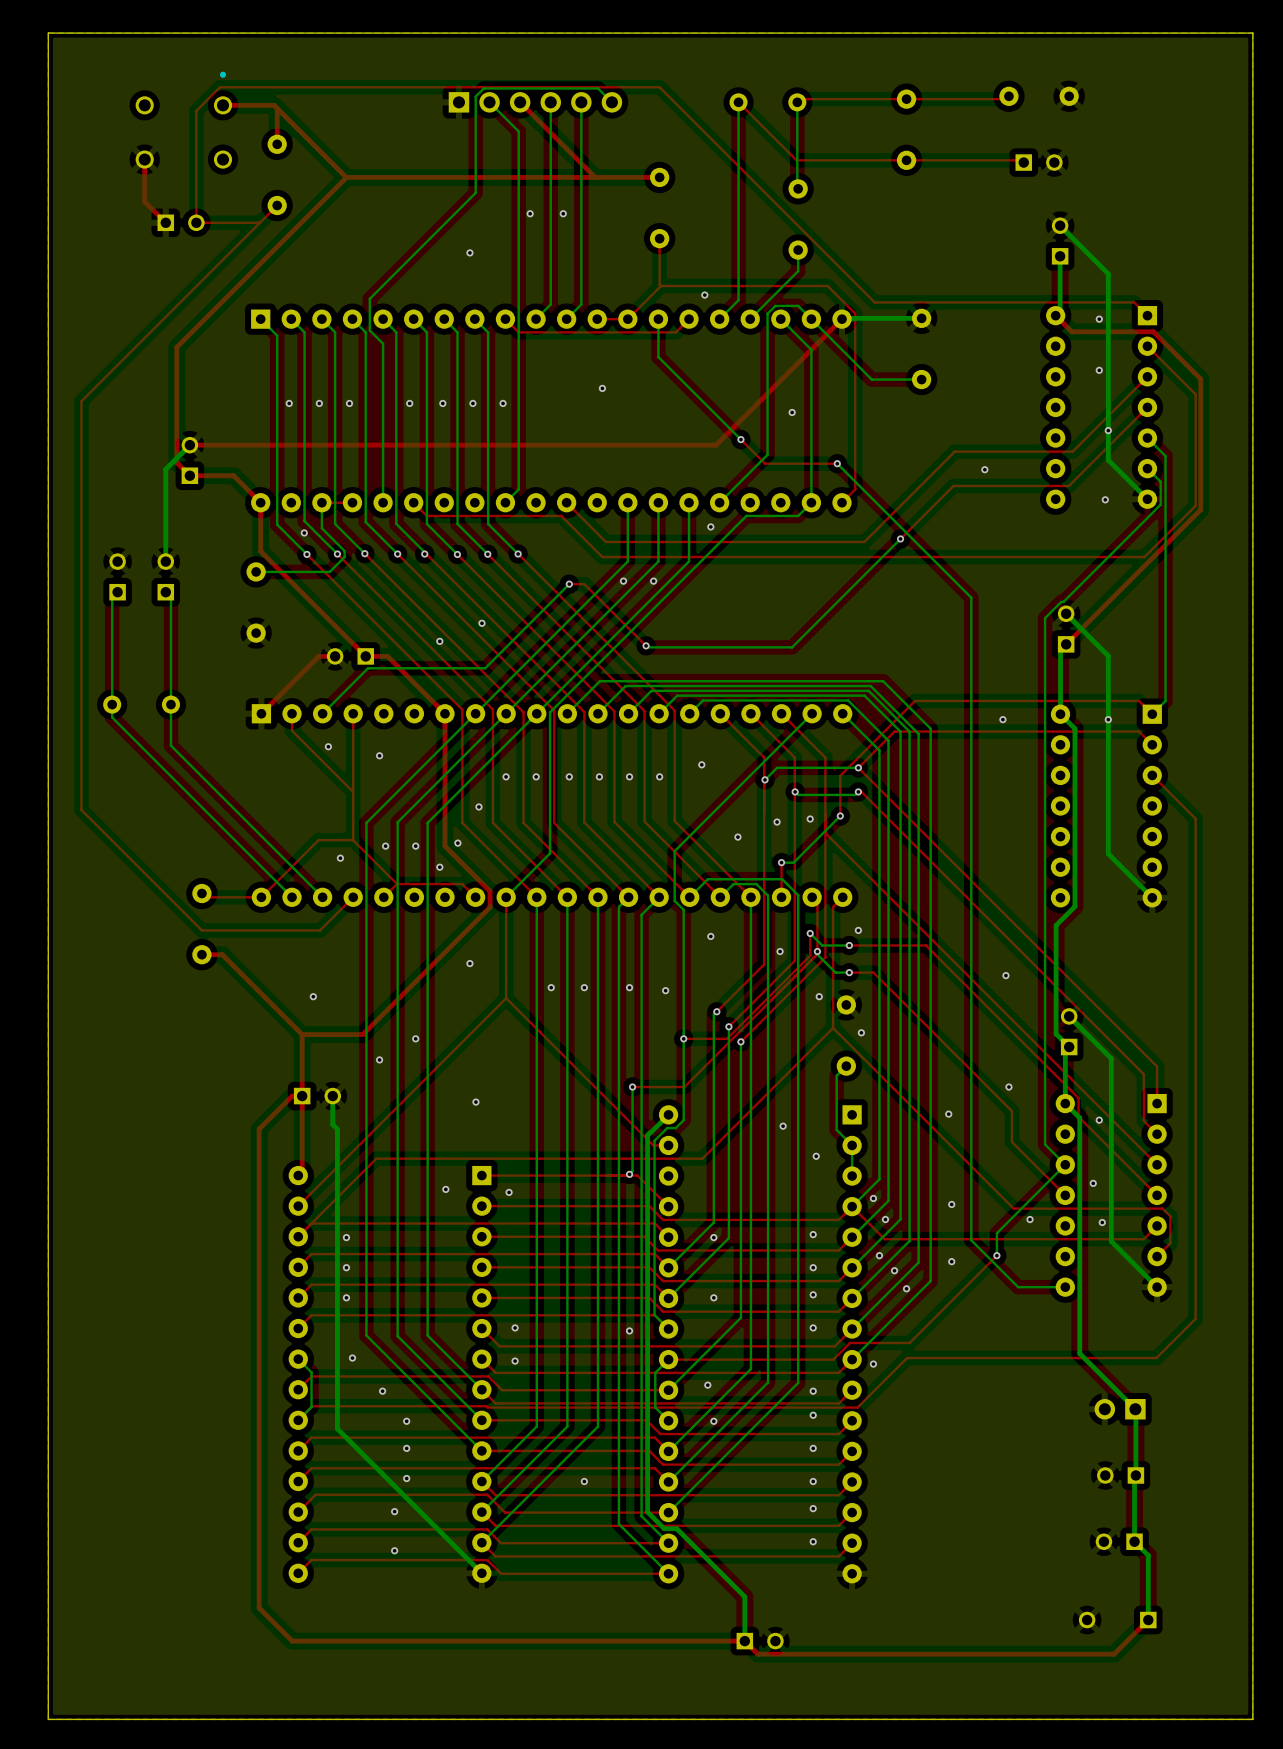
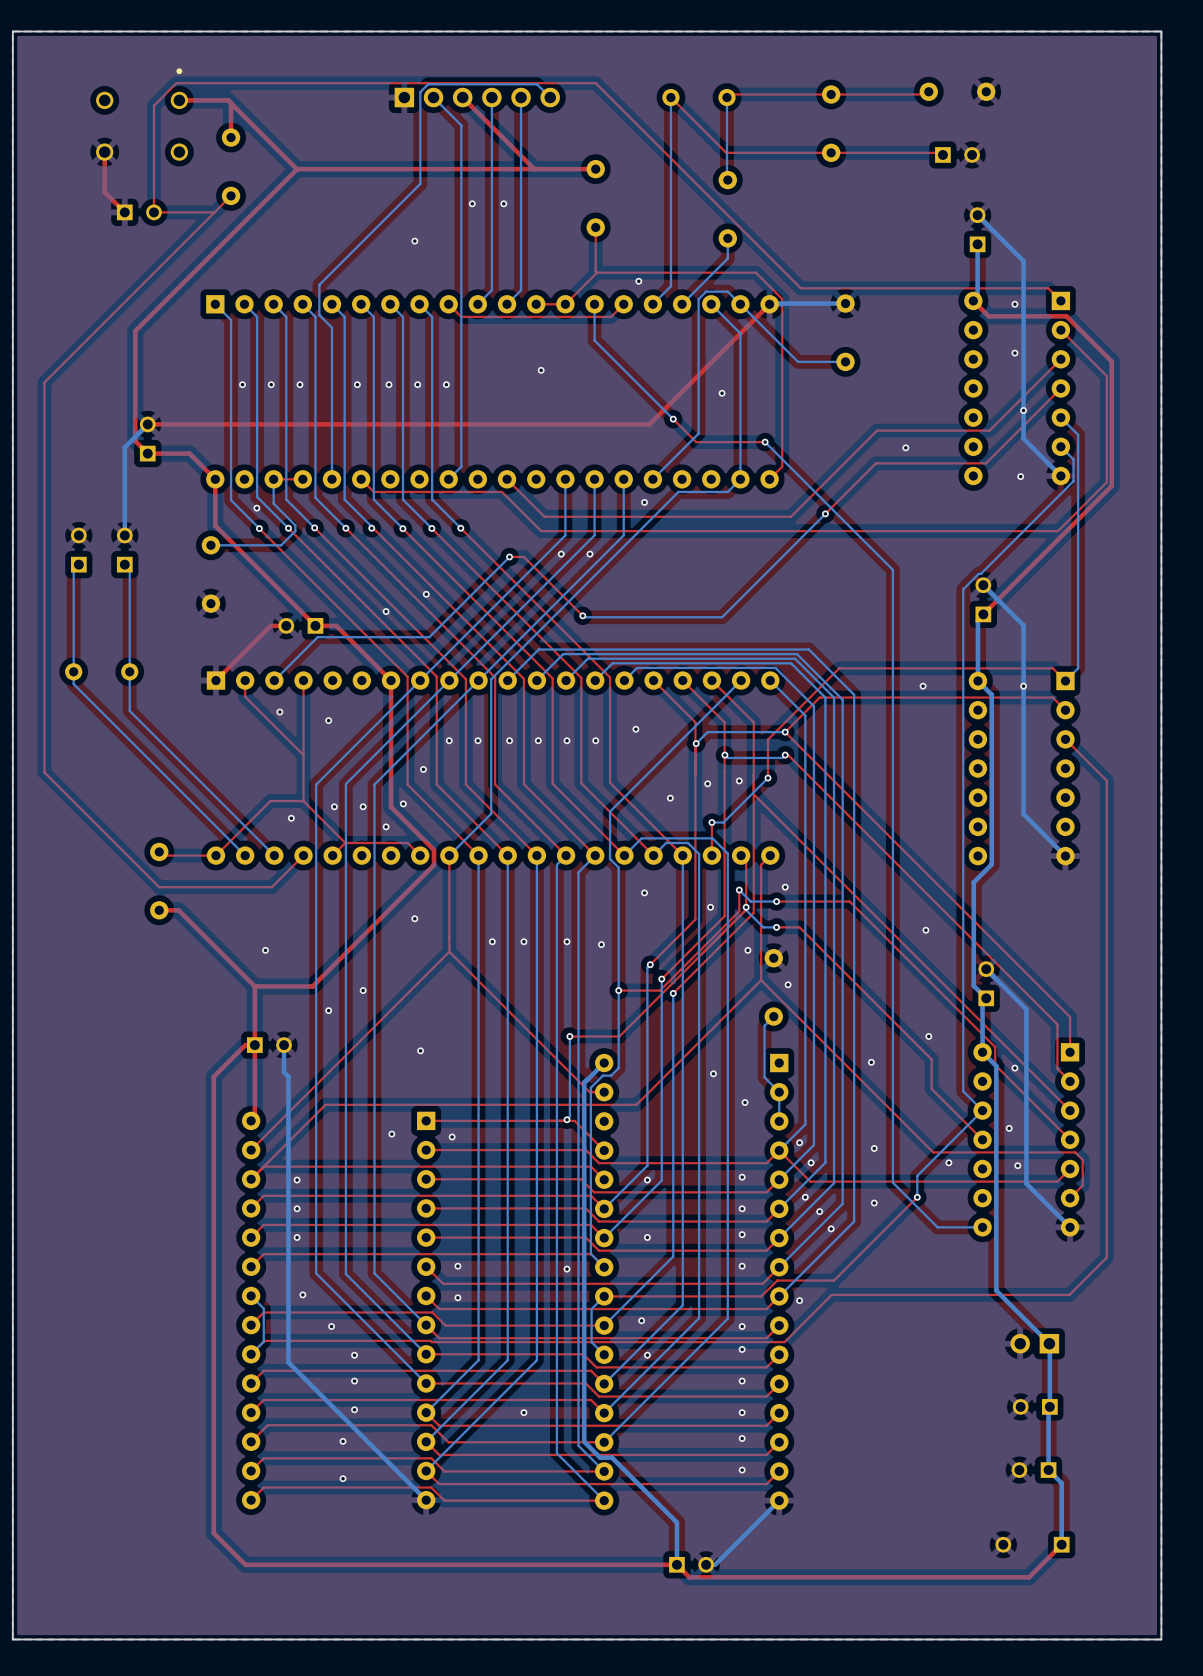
bottom track: none -> (779, 1500) (715, 1564) (706, 1564)

